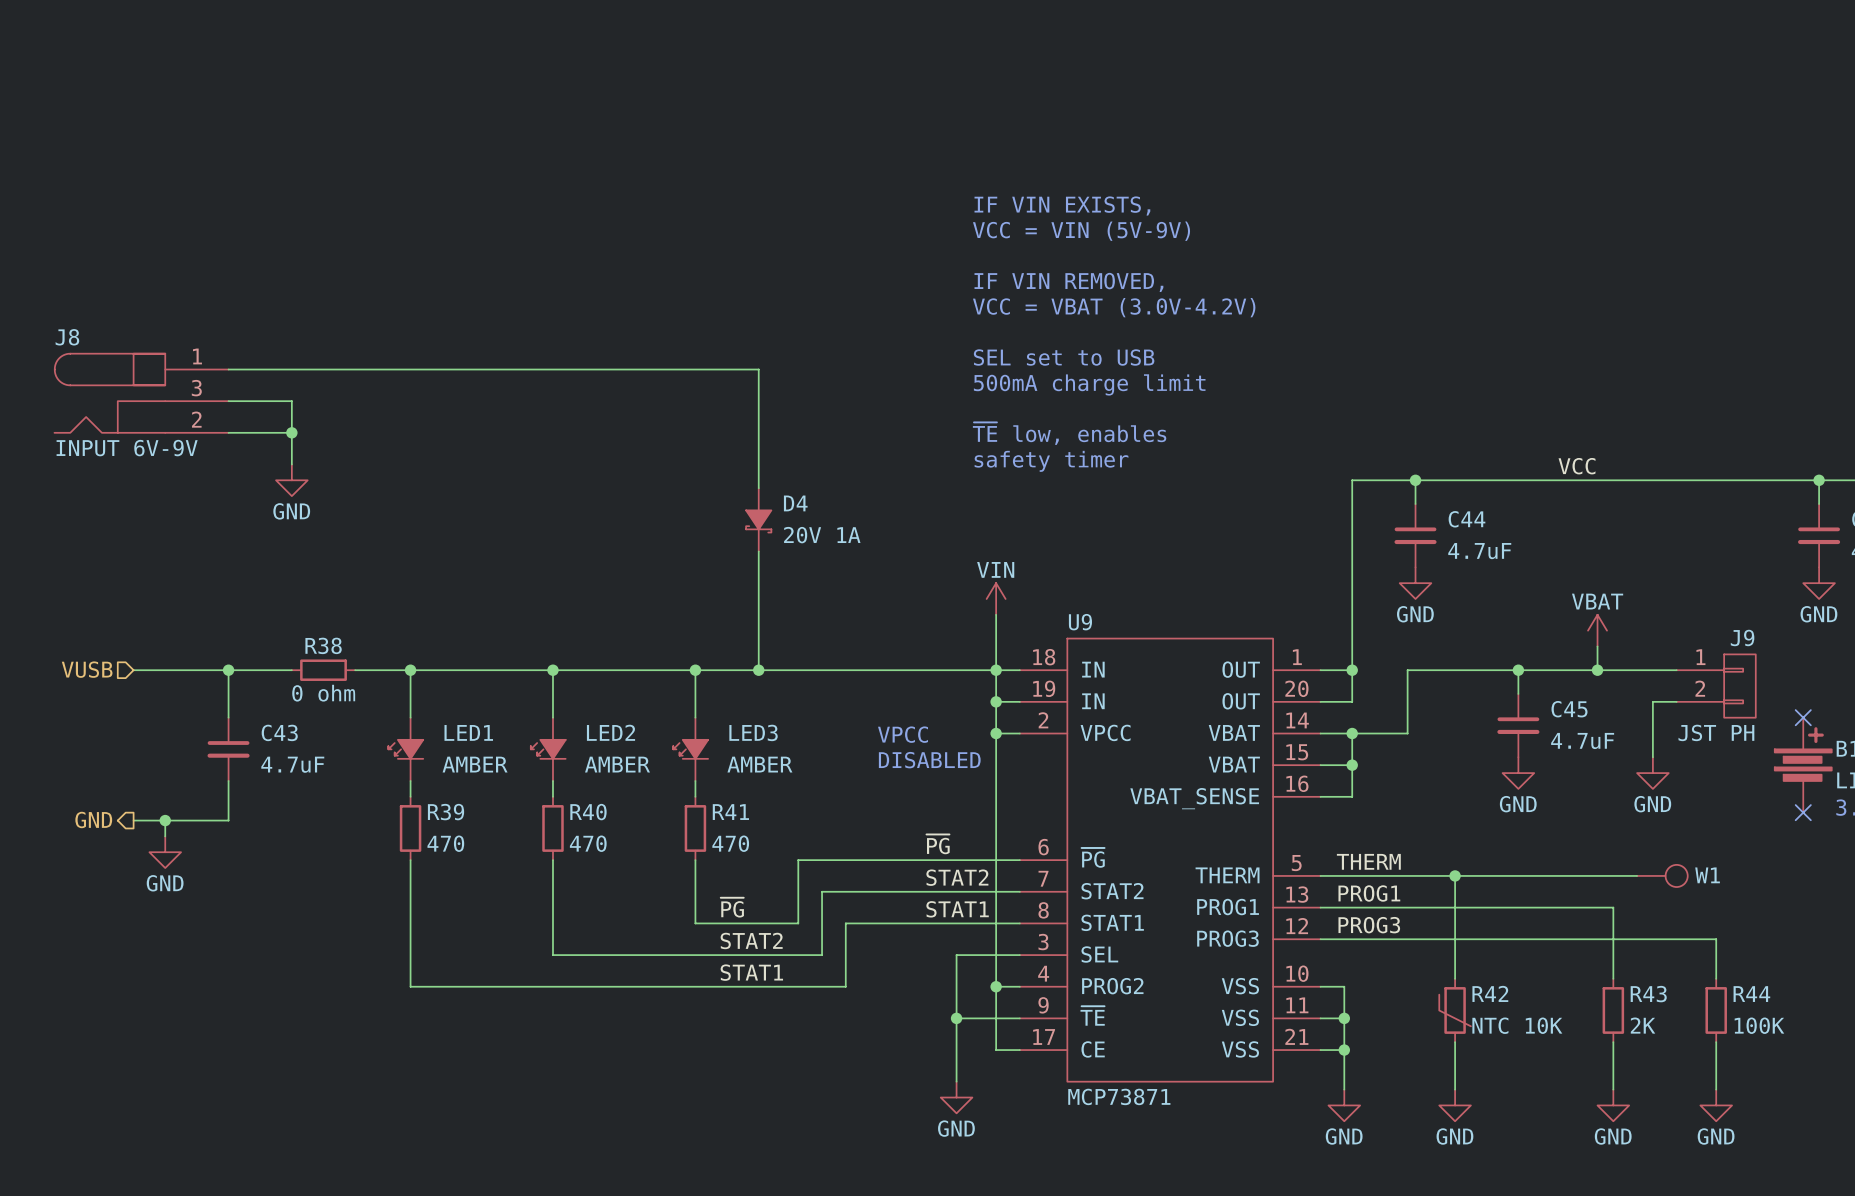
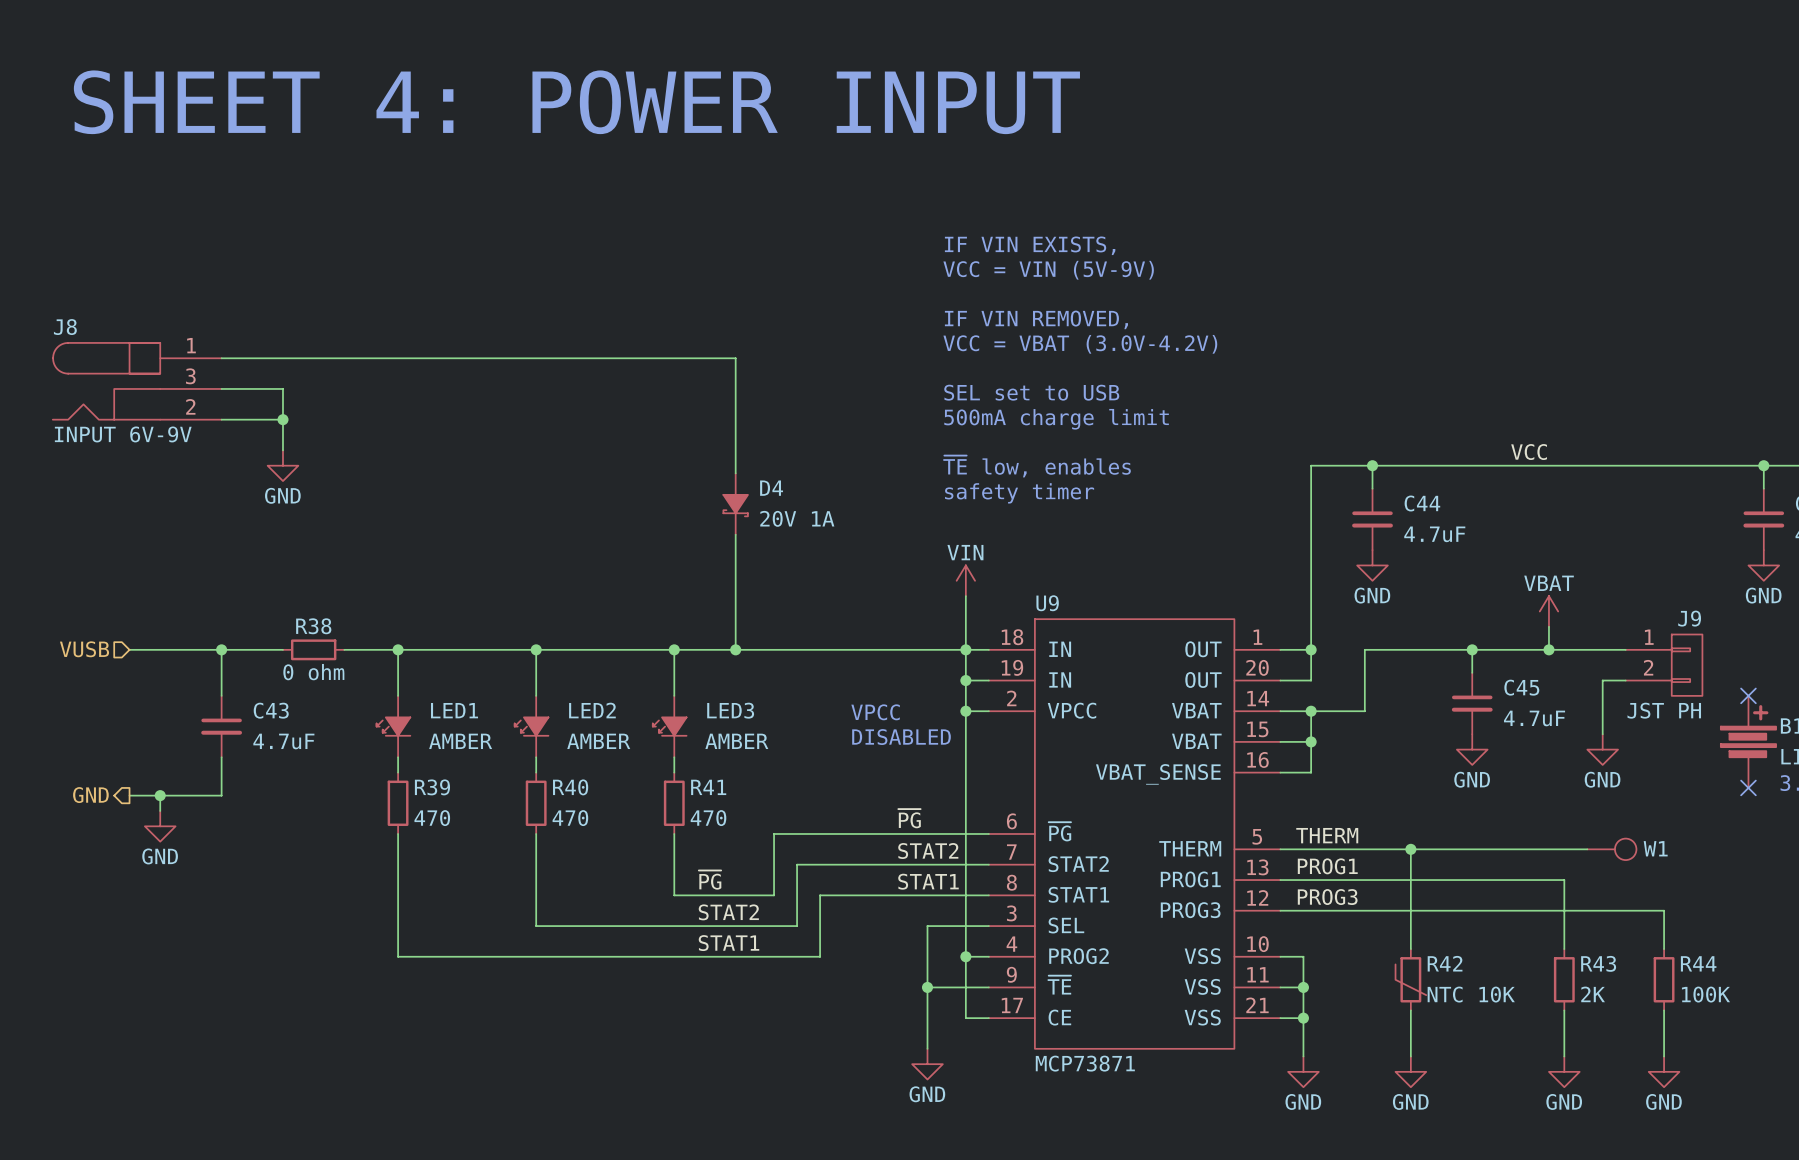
text: none -> SHEET 4: POWER INPUT (576, 102)
text position: IF VIN EXISTS, (1062, 206) -> IF VIN EXISTS, (1030, 245)
text position: VCC = VIN (5V-9V) (1081, 231) -> VCC = VIN (5V-9V) (1048, 270)
text position: IF VIN REMOVED, (1068, 282) -> IF VIN REMOVED, (1036, 319)
text position: VCC = VBAT (3.0V-4.2V) (1114, 307) -> VCC = VBAT (3.0V-4.2V) (1080, 344)
text position: SEL set to USB (1064, 357) -> SEL set to USB (1031, 392)
text position: 500mA charge limit (1089, 384) -> 500mA charge limit (1056, 419)
text position: ~{TE} low, enables (1069, 433) -> ~{TE} low, enables (1037, 466)
text position: safety timer (1051, 461) -> safety timer (1019, 493)

